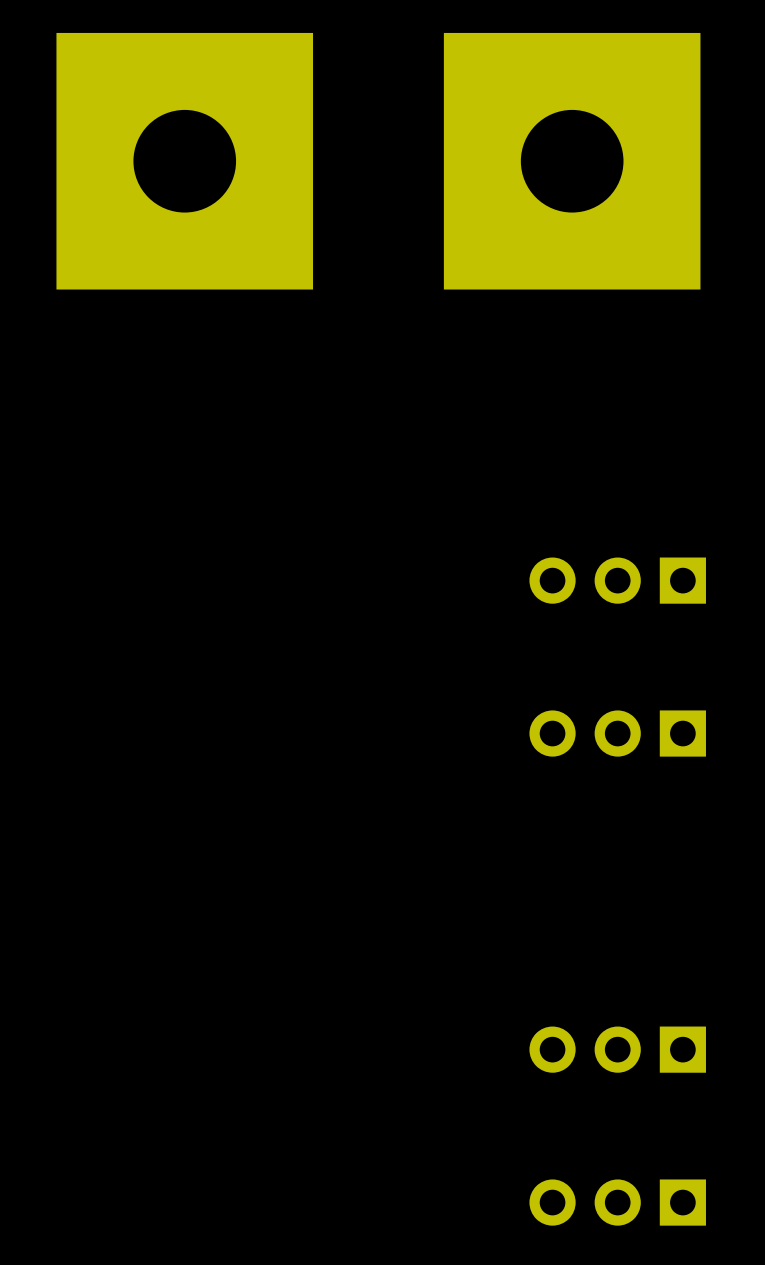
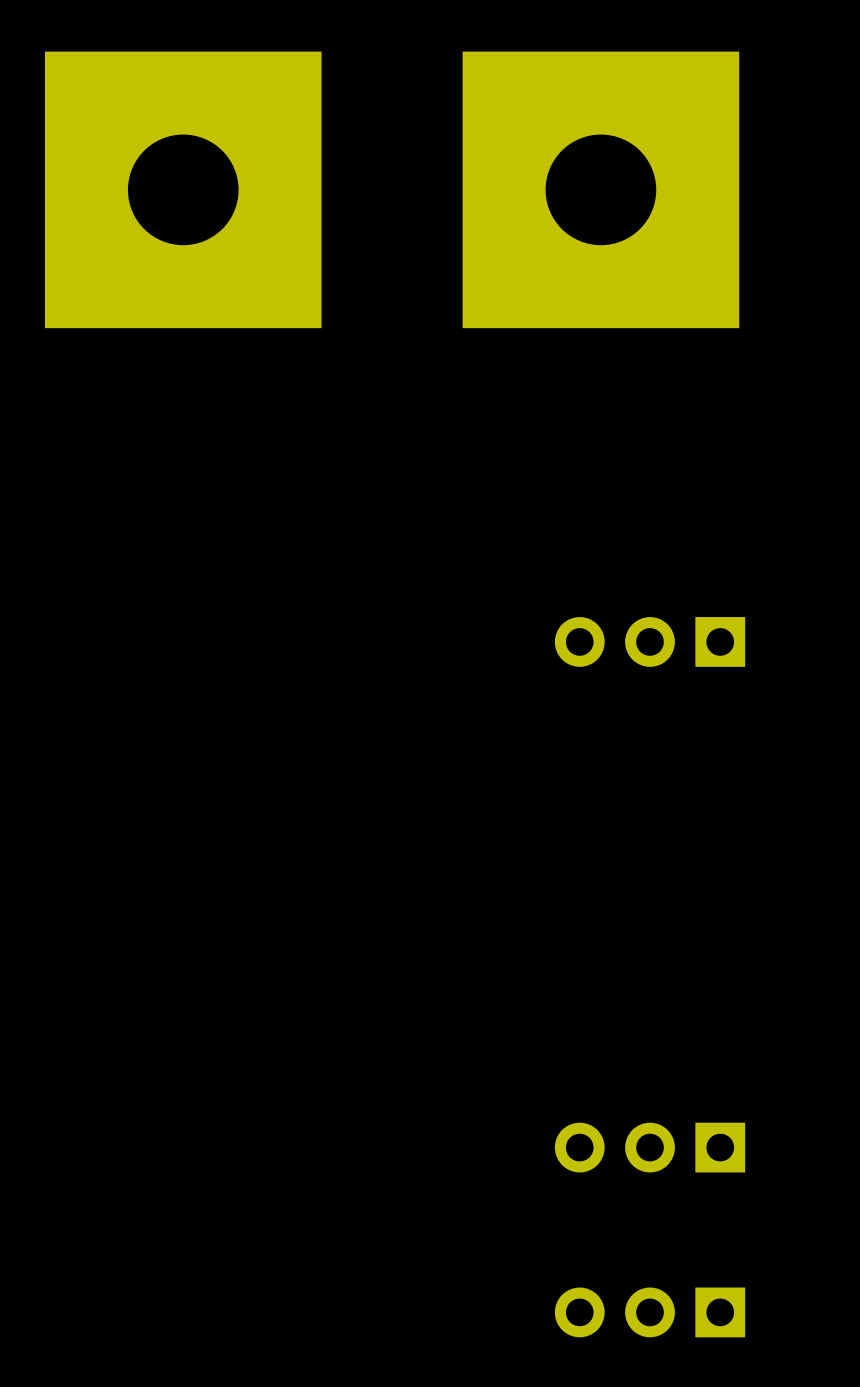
part: (617, 733) -> none

